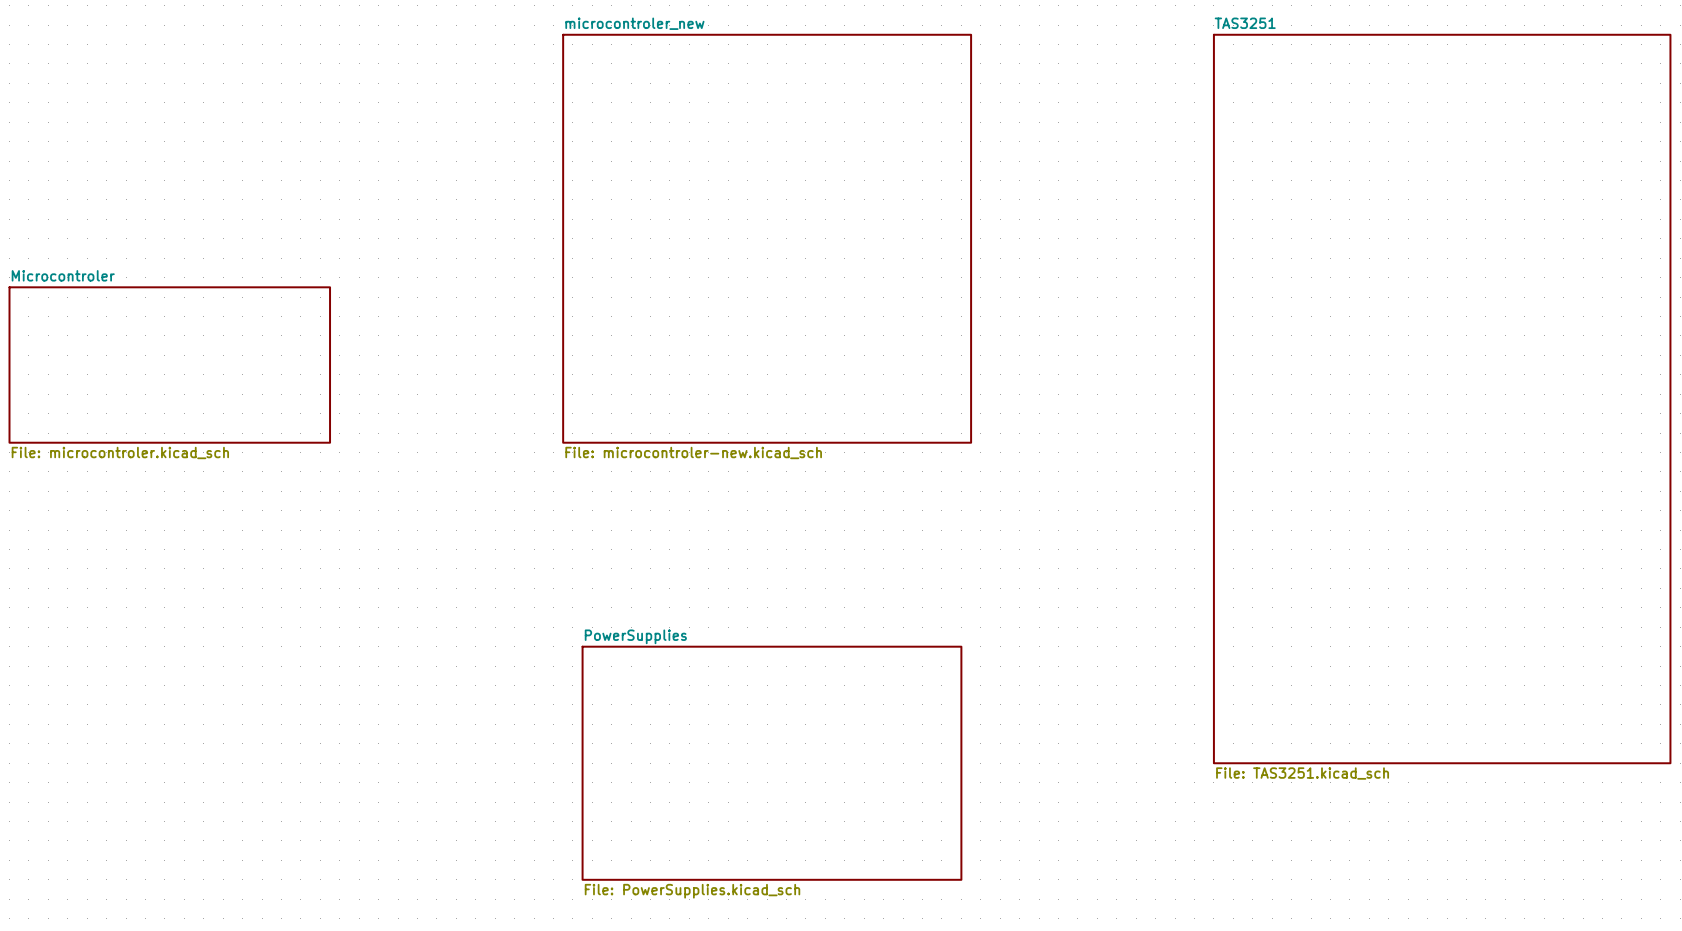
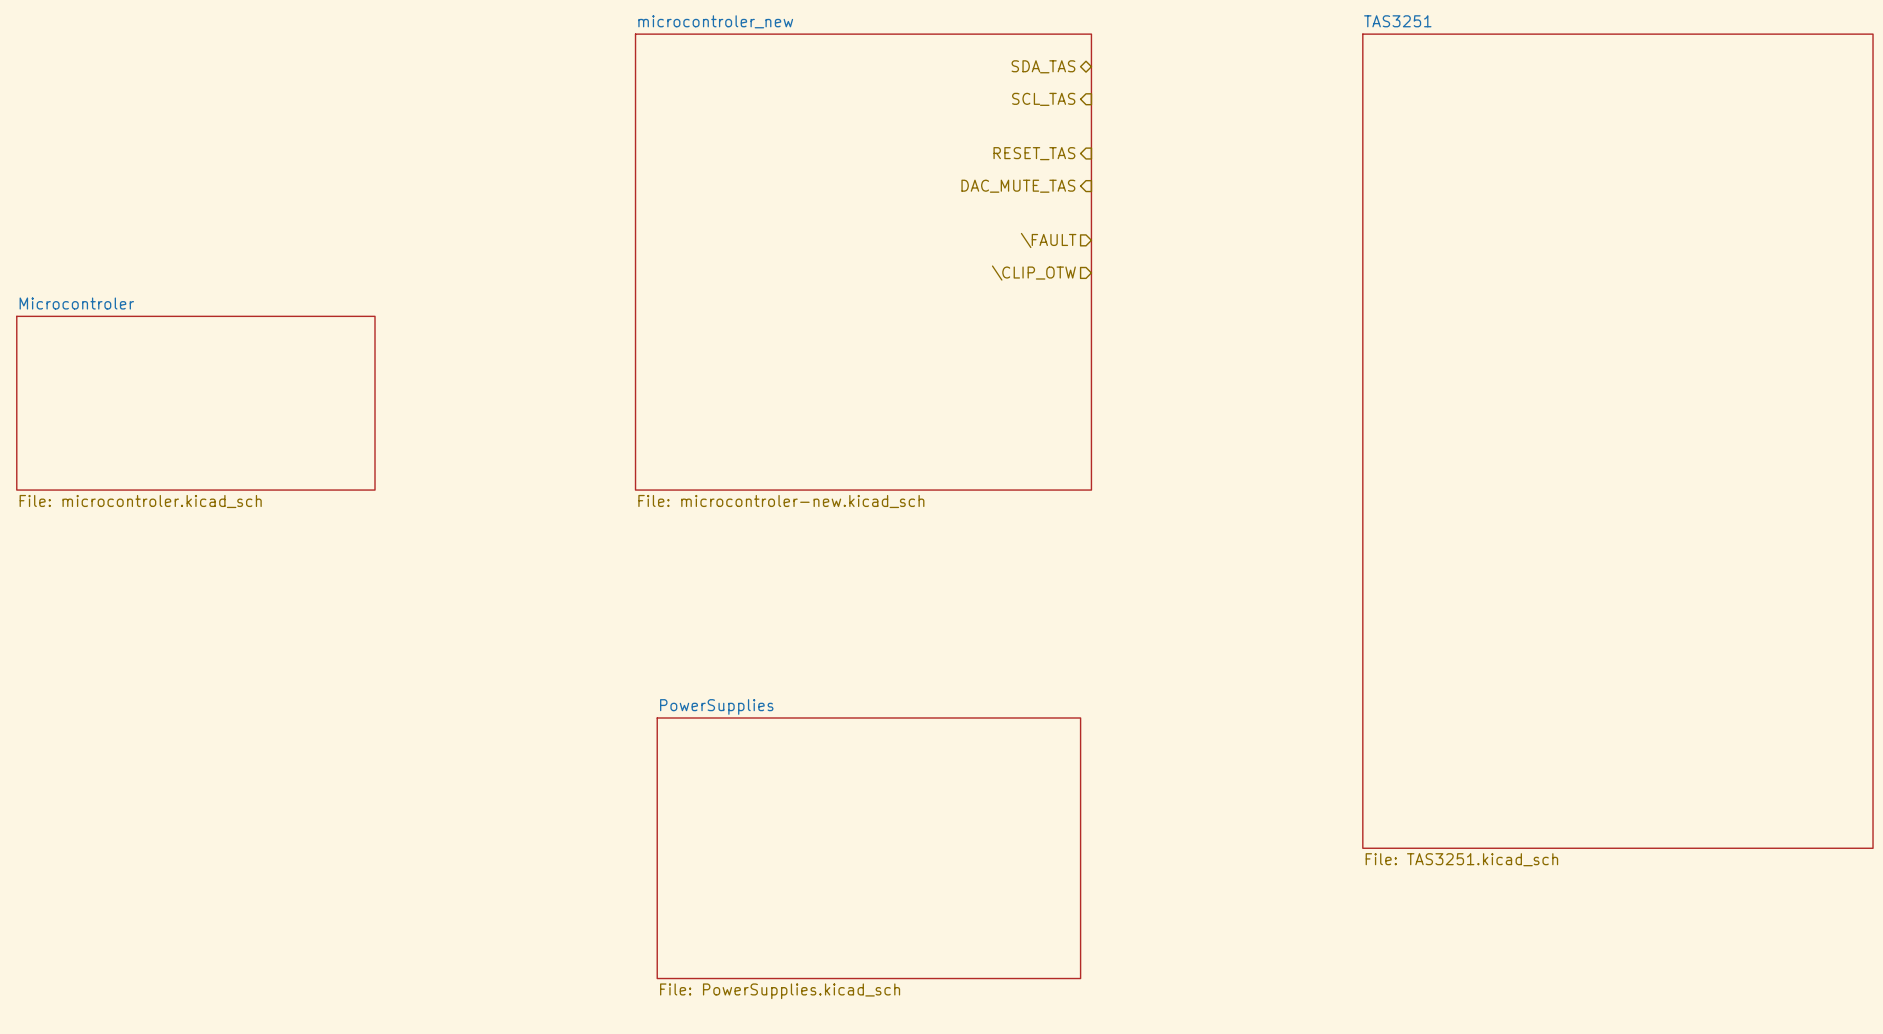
hierarchical label: none -> SDA_TAS (1043, 66)
hierarchical label: none -> SCL_TAS (1043, 99)
hierarchical label: none -> RESET_TAS (1034, 153)
hierarchical label: none -> DAC_MUTE_TAS (1018, 186)
hierarchical label: none -> \FAULT (1048, 240)
hierarchical label: none -> \CLIP_OTW (1033, 273)

